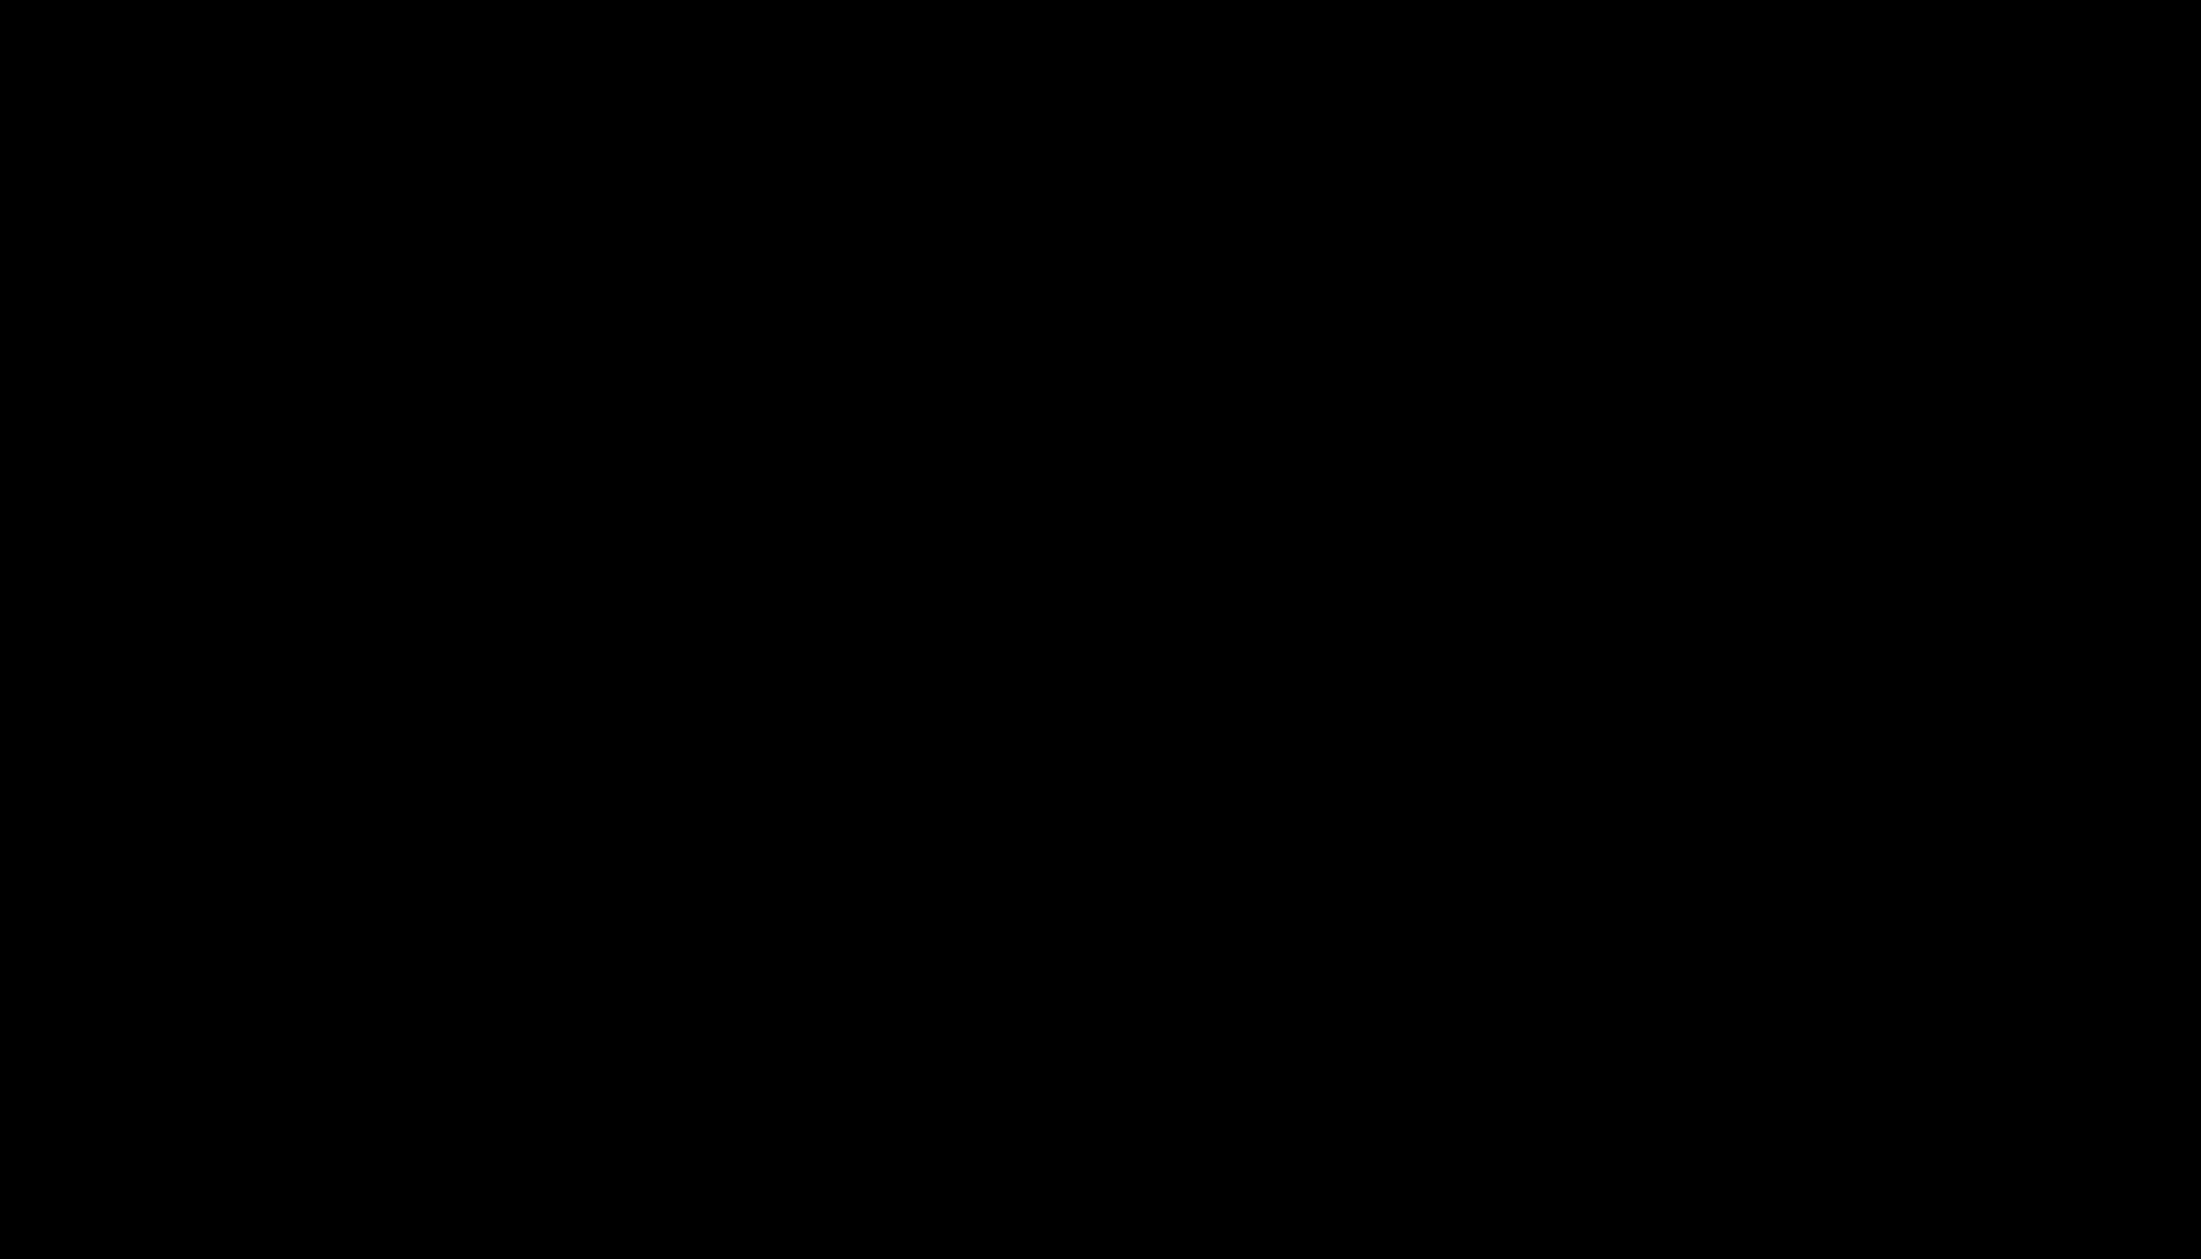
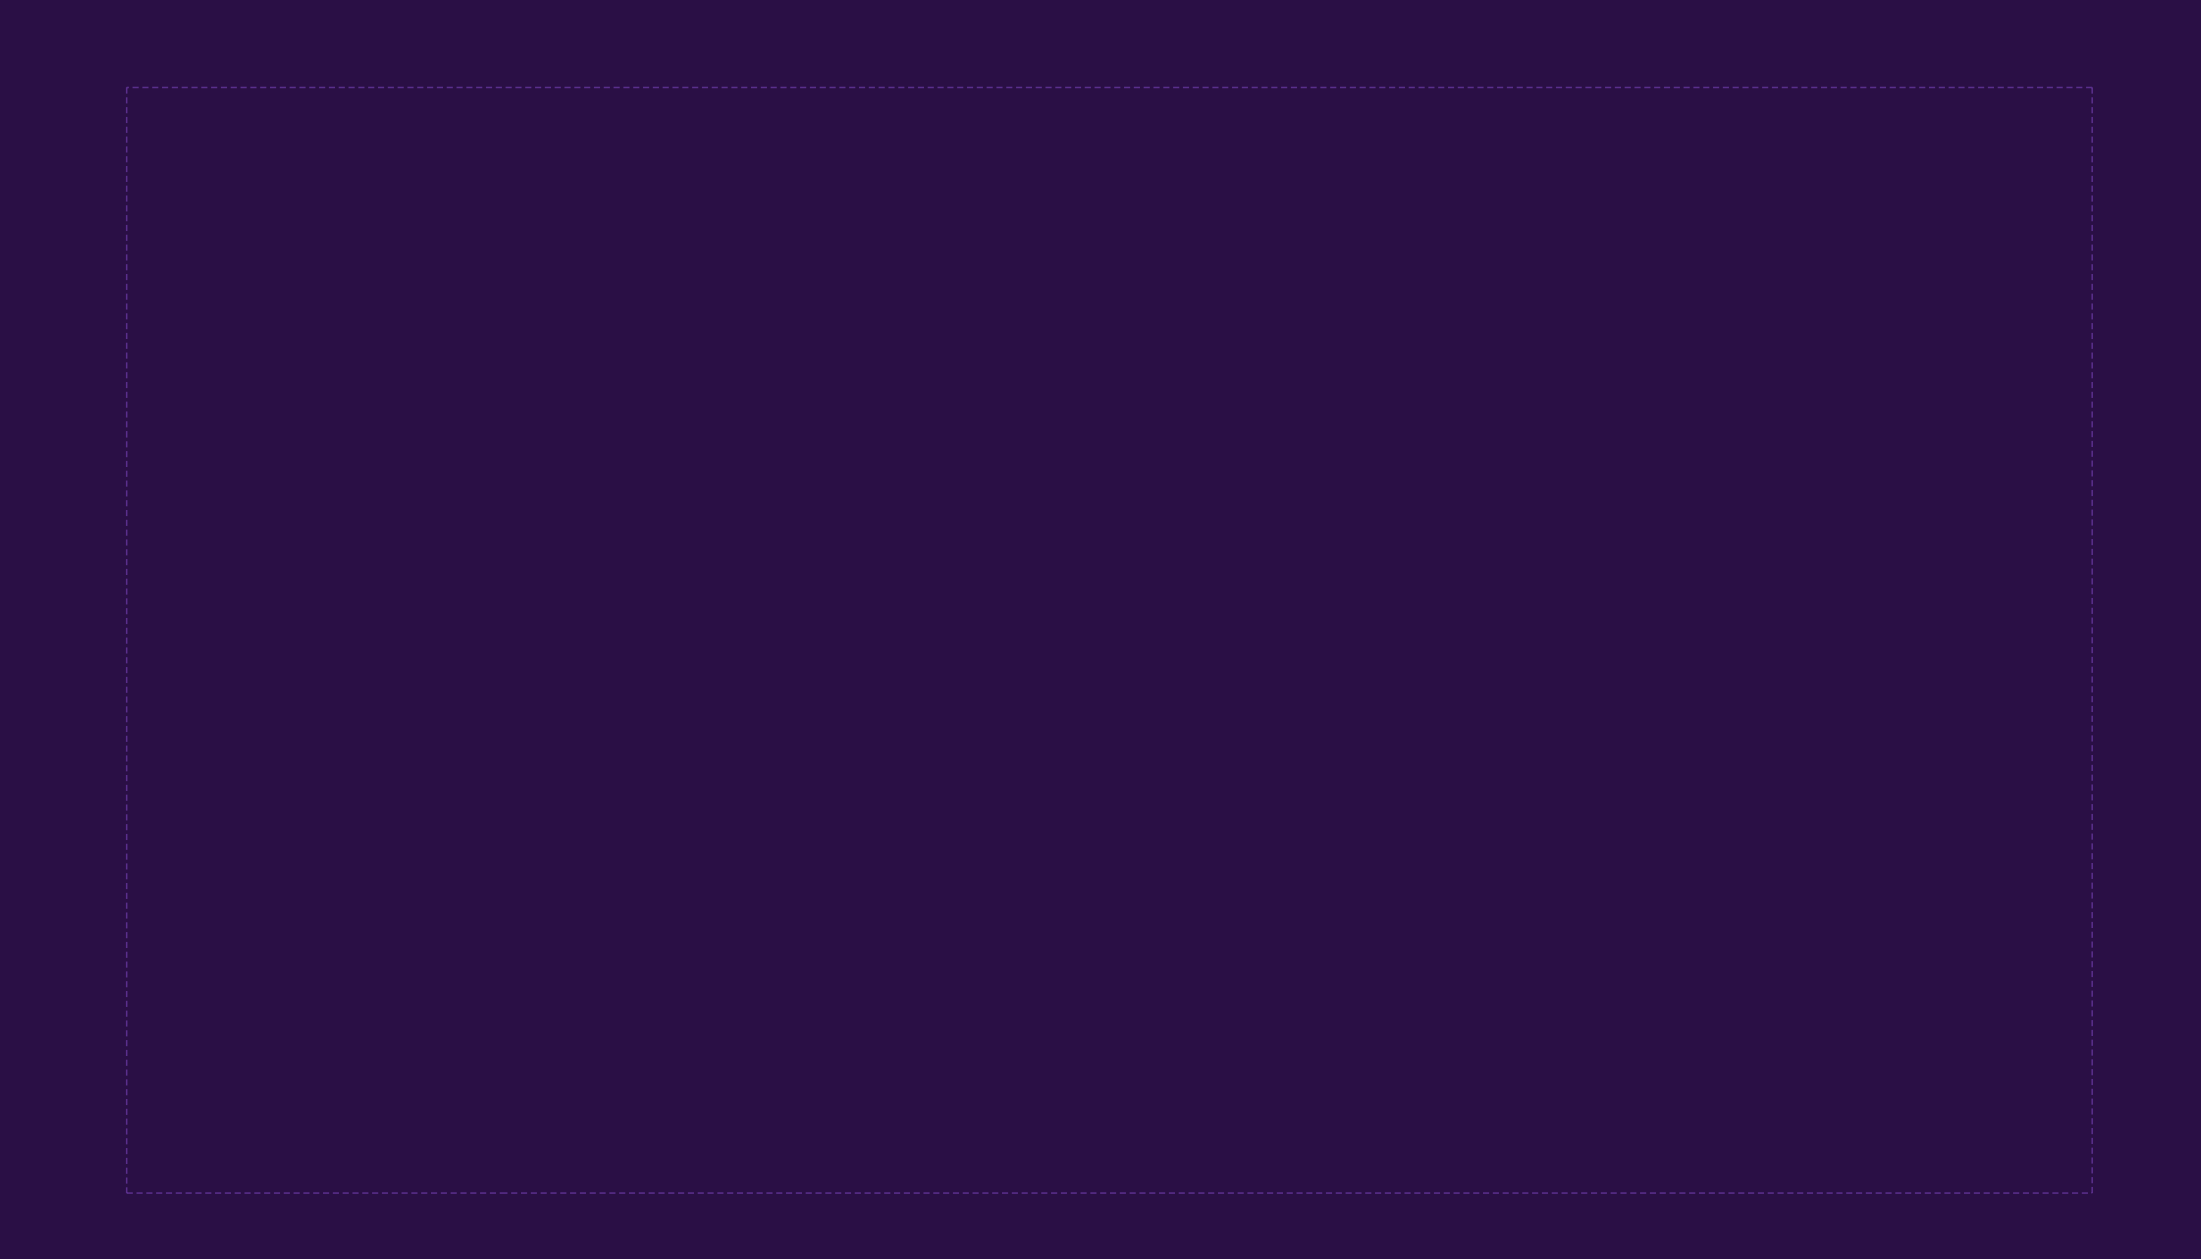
zone outline: none -> (126, 87) (2092, 87) (2092, 1193) (126, 1193) (126, 87)

